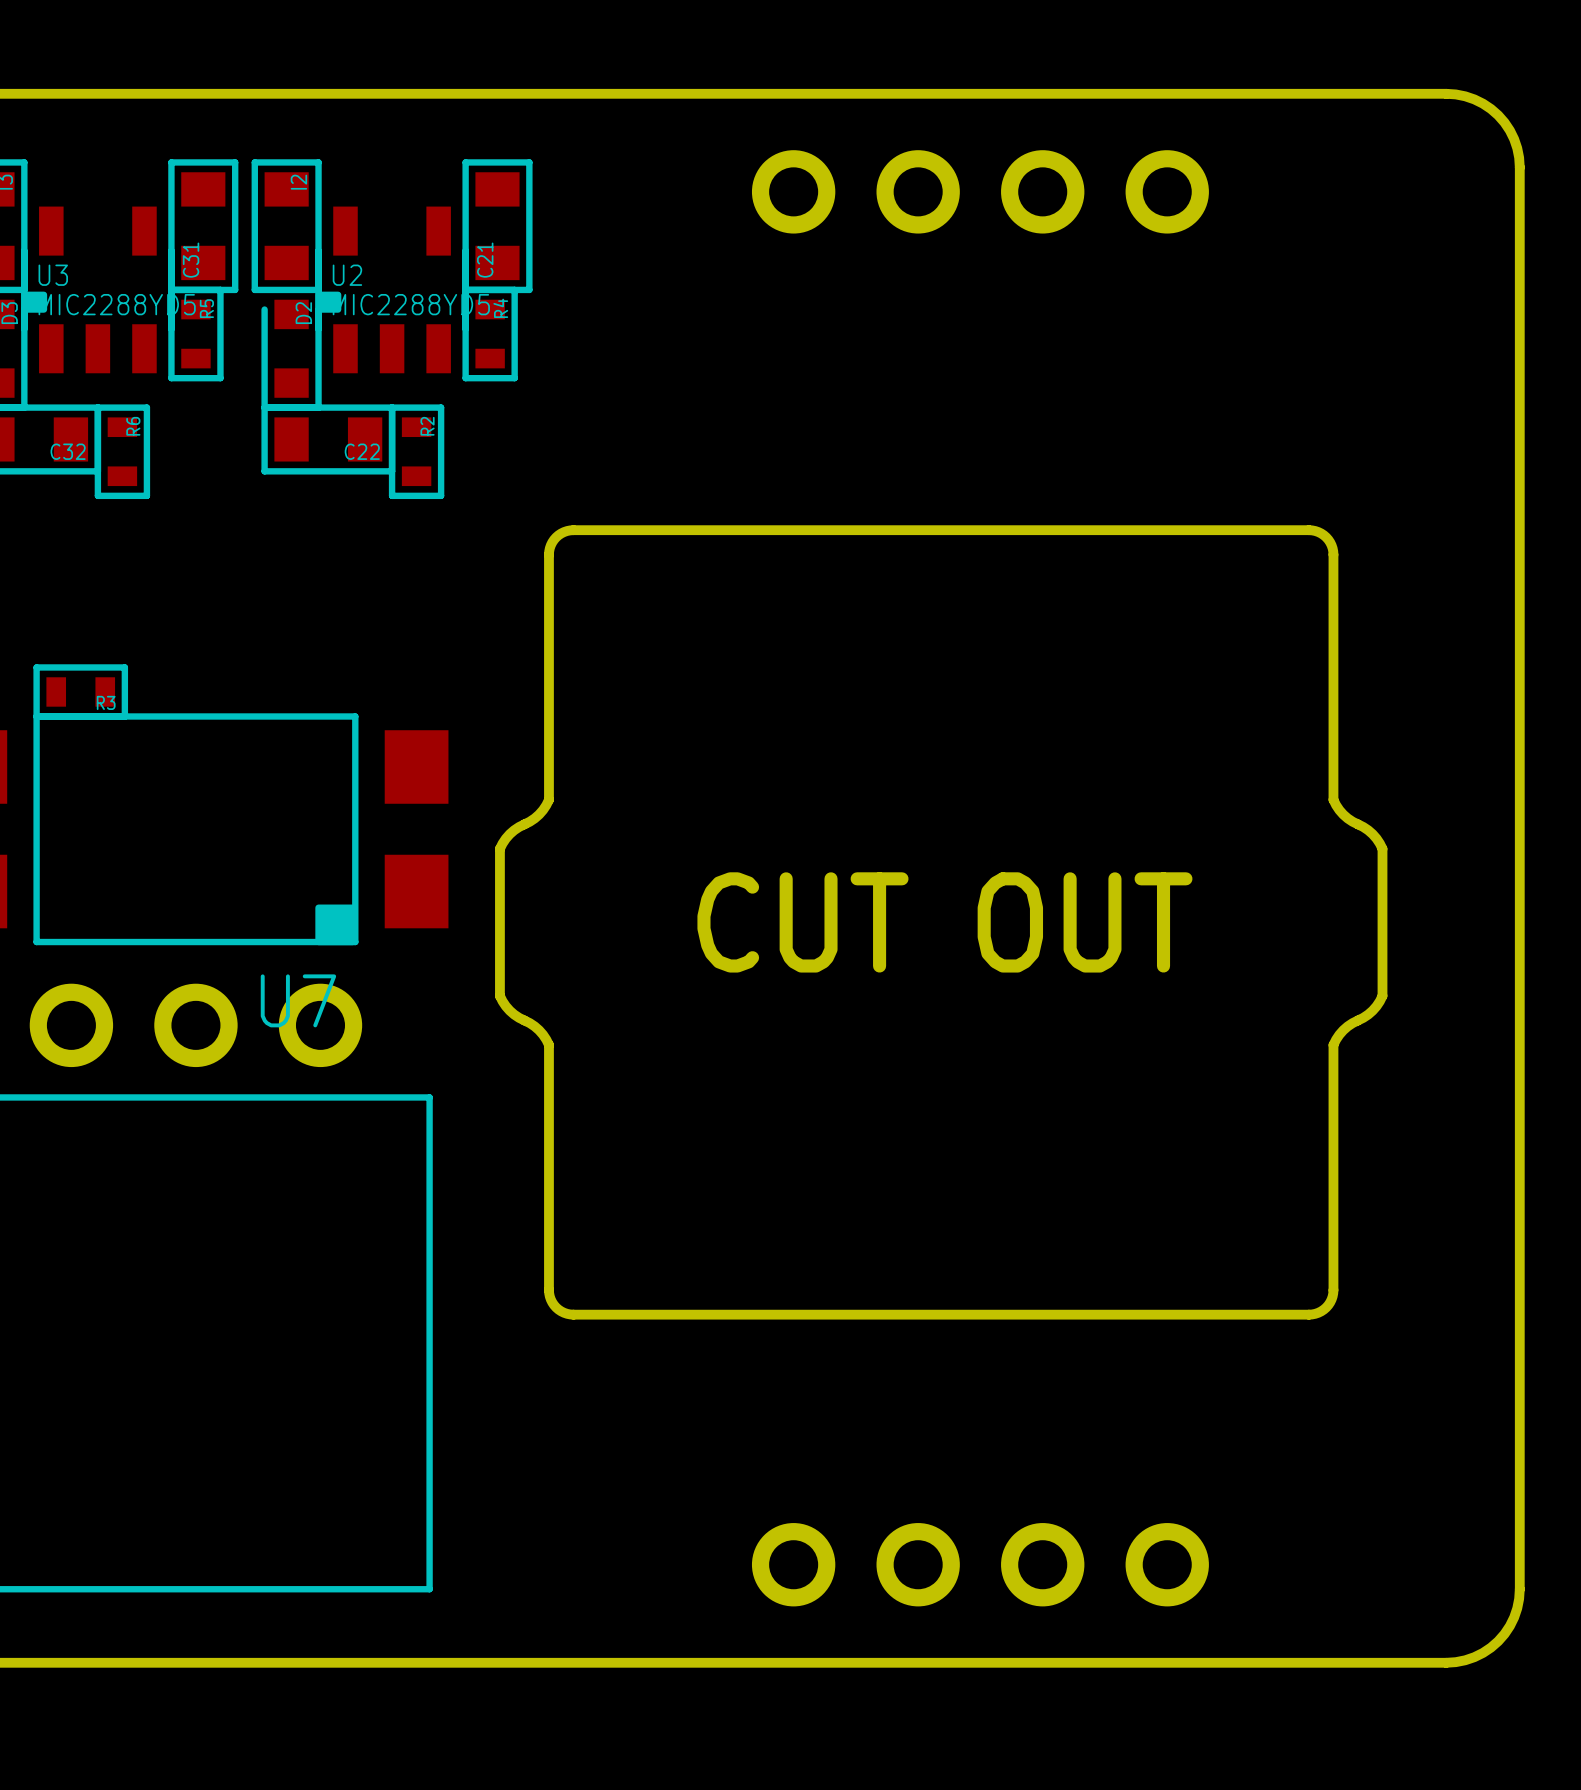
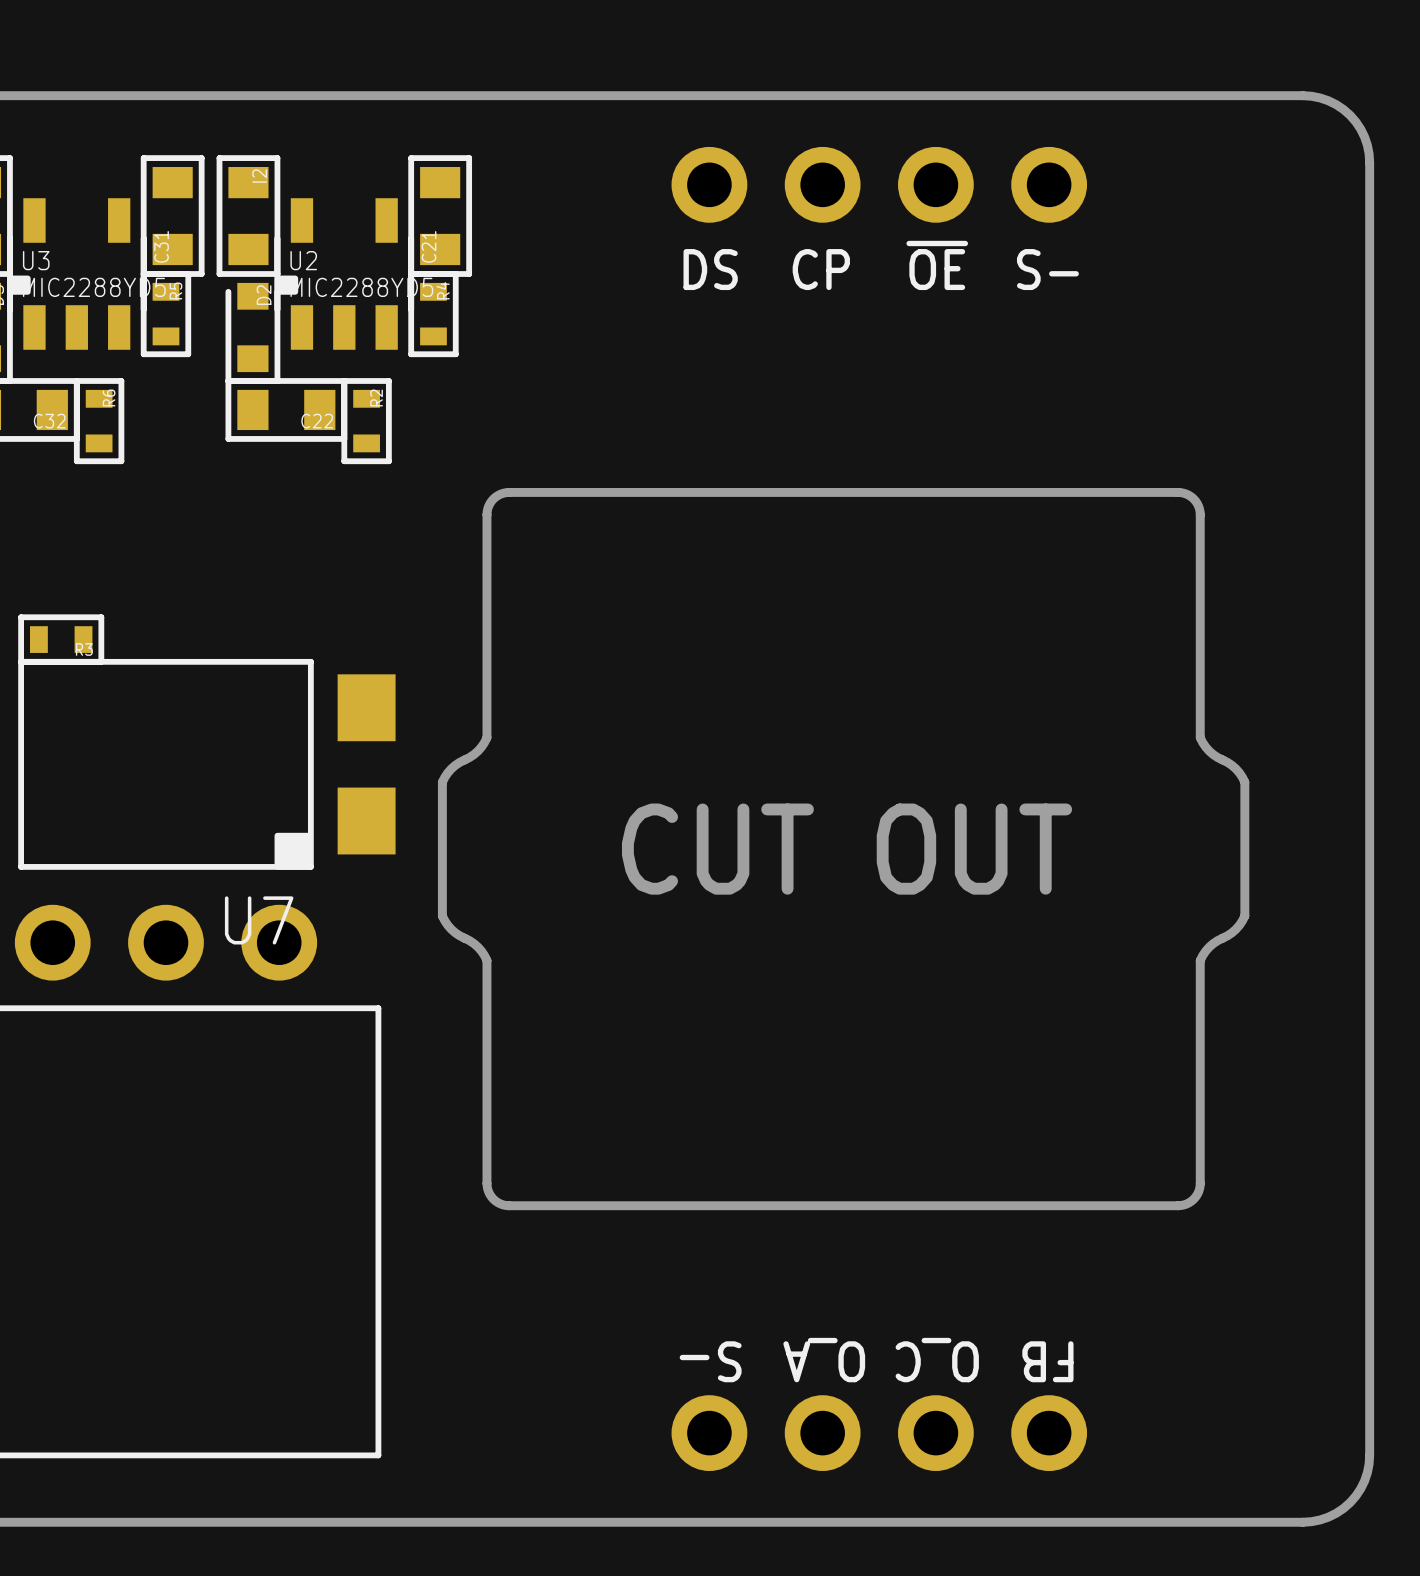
text: none -> ~{OE} (937, 265)
text: none -> DS (710, 269)
text: none -> CP (821, 269)
text: none -> S- (1047, 269)
text: none -> O_A (824, 1360)
text: none -> O_C (937, 1360)
text: none -> S- (710, 1361)
text: none -> FB (1047, 1361)

